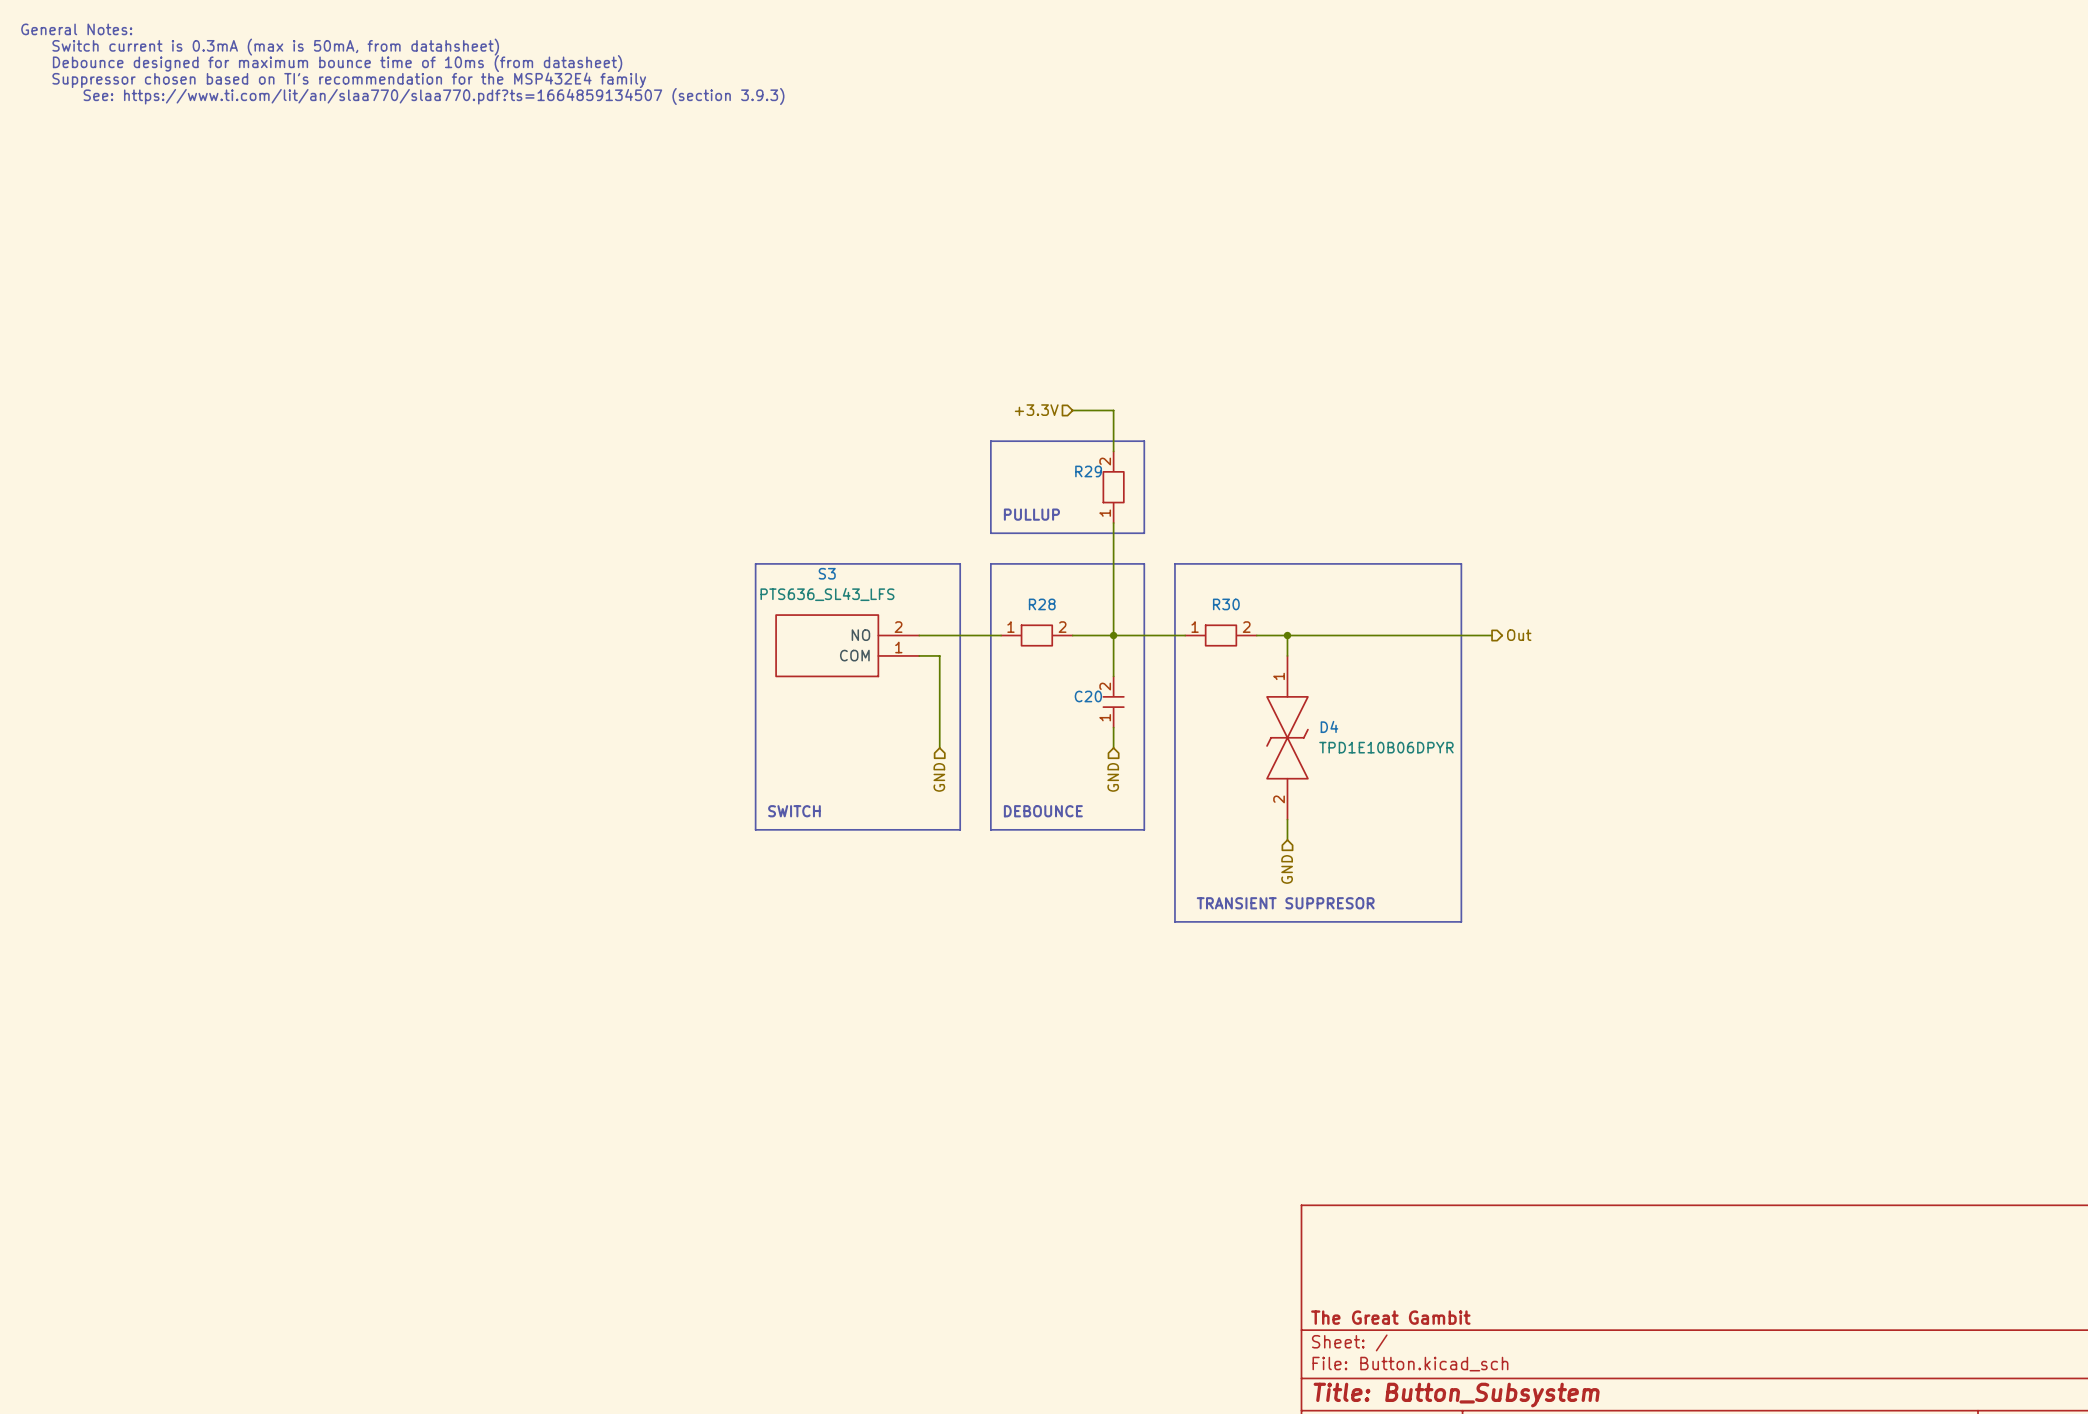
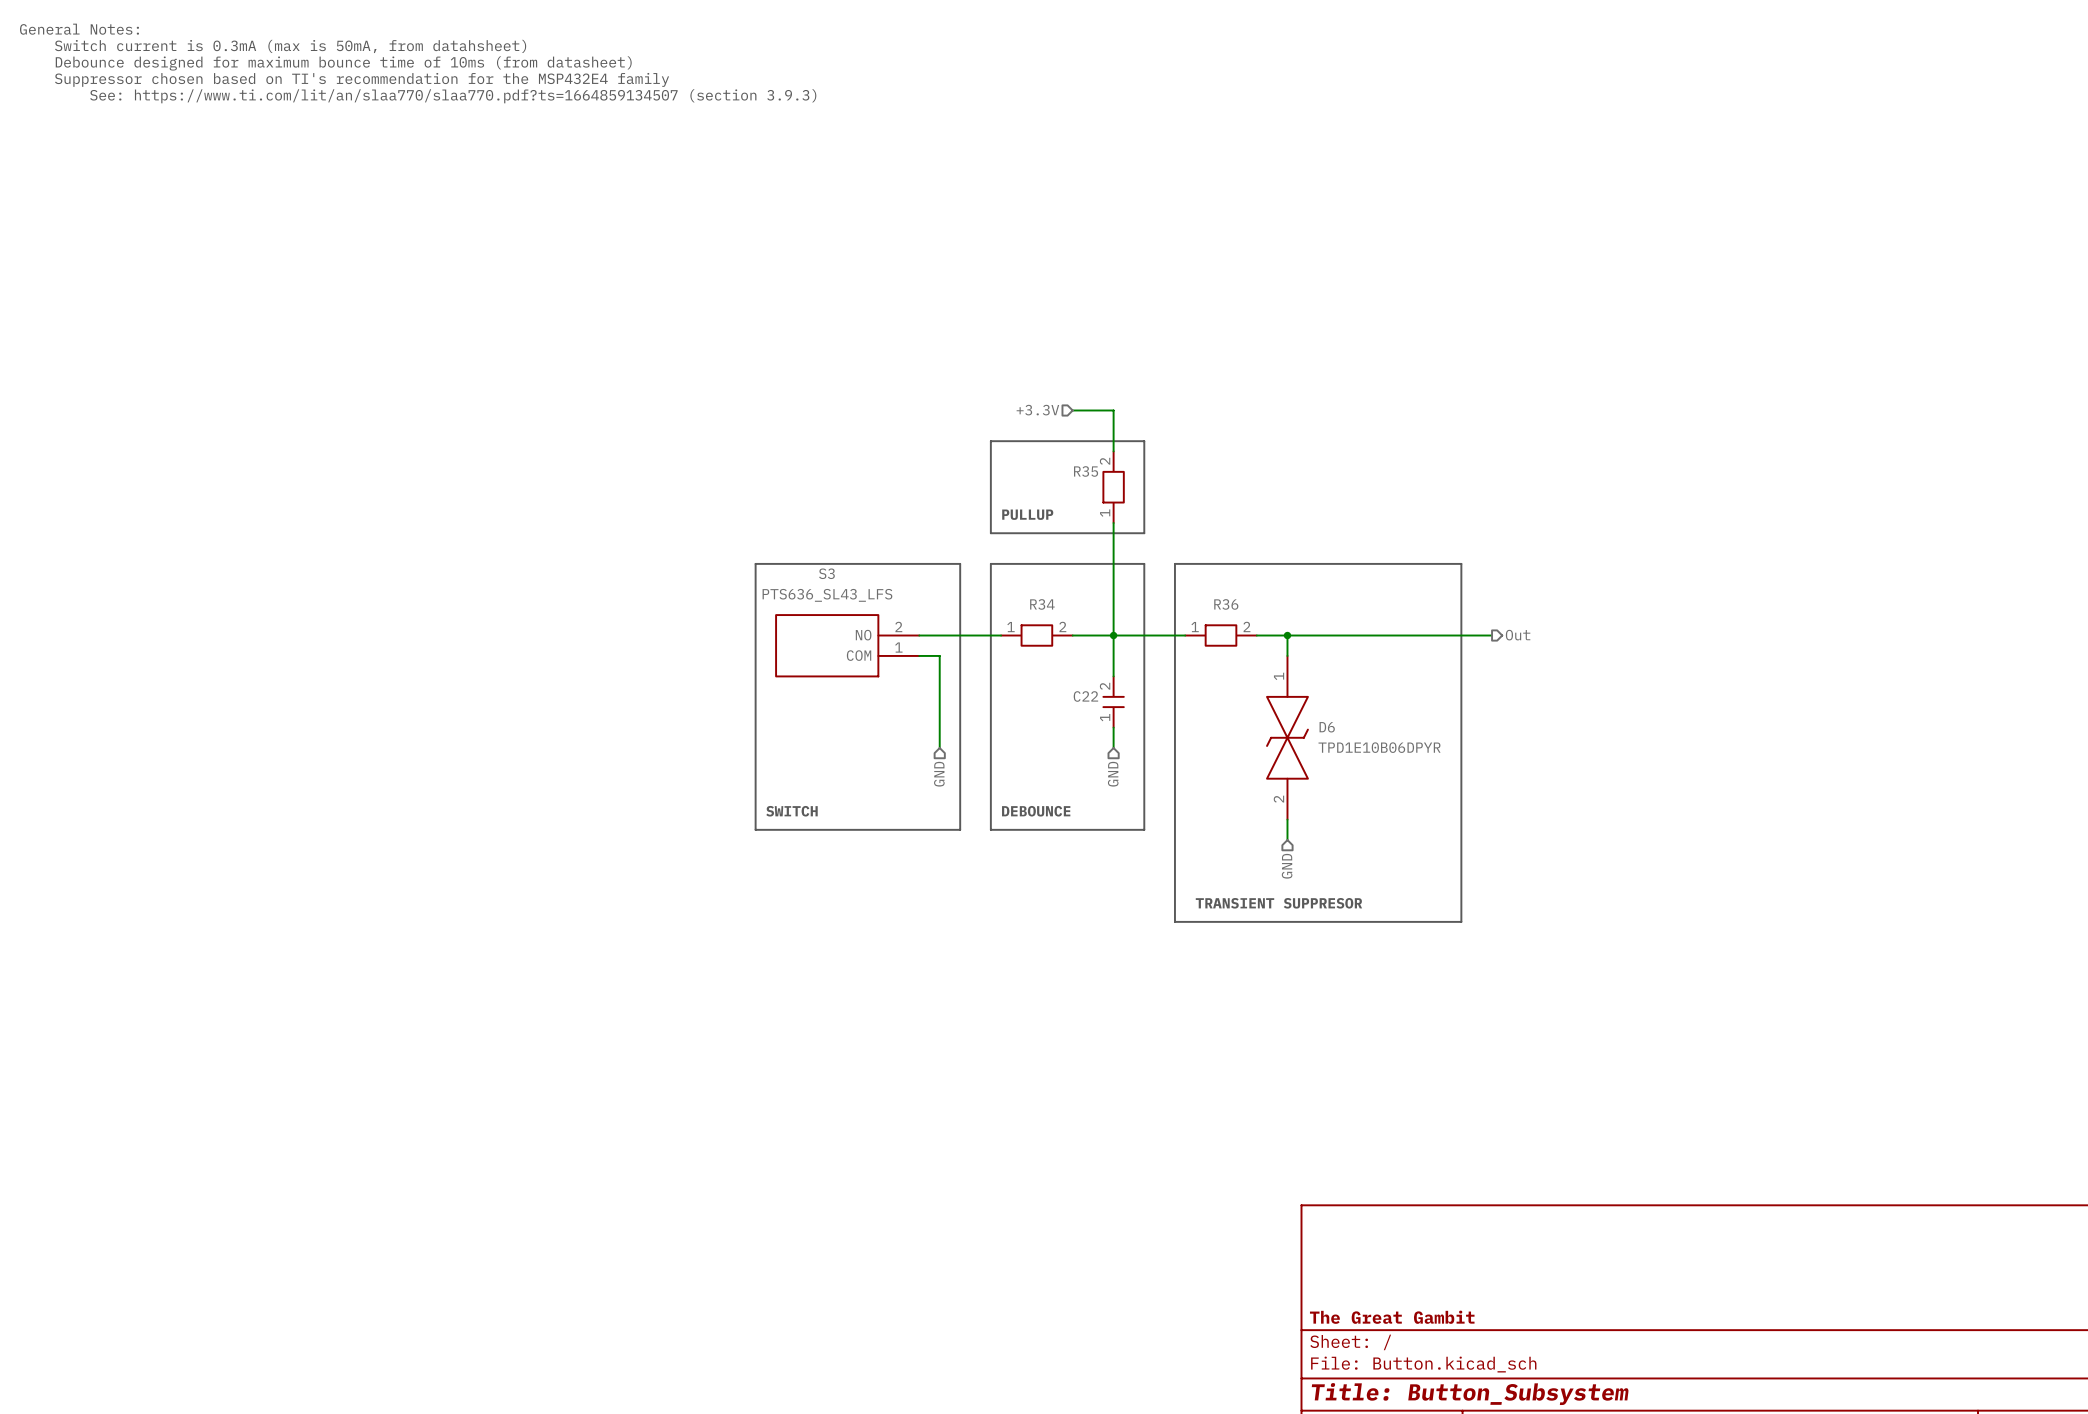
R29 name: R29 (1088, 471) -> R35 (1086, 471)
R28 name: R28 (1042, 604) -> R34 (1042, 604)
R30 name: R30 (1226, 604) -> R36 (1226, 604)
C20 name: C20 (1088, 696) -> C22 (1085, 696)
D4 name: D4 (1329, 726) -> D6 (1327, 727)

